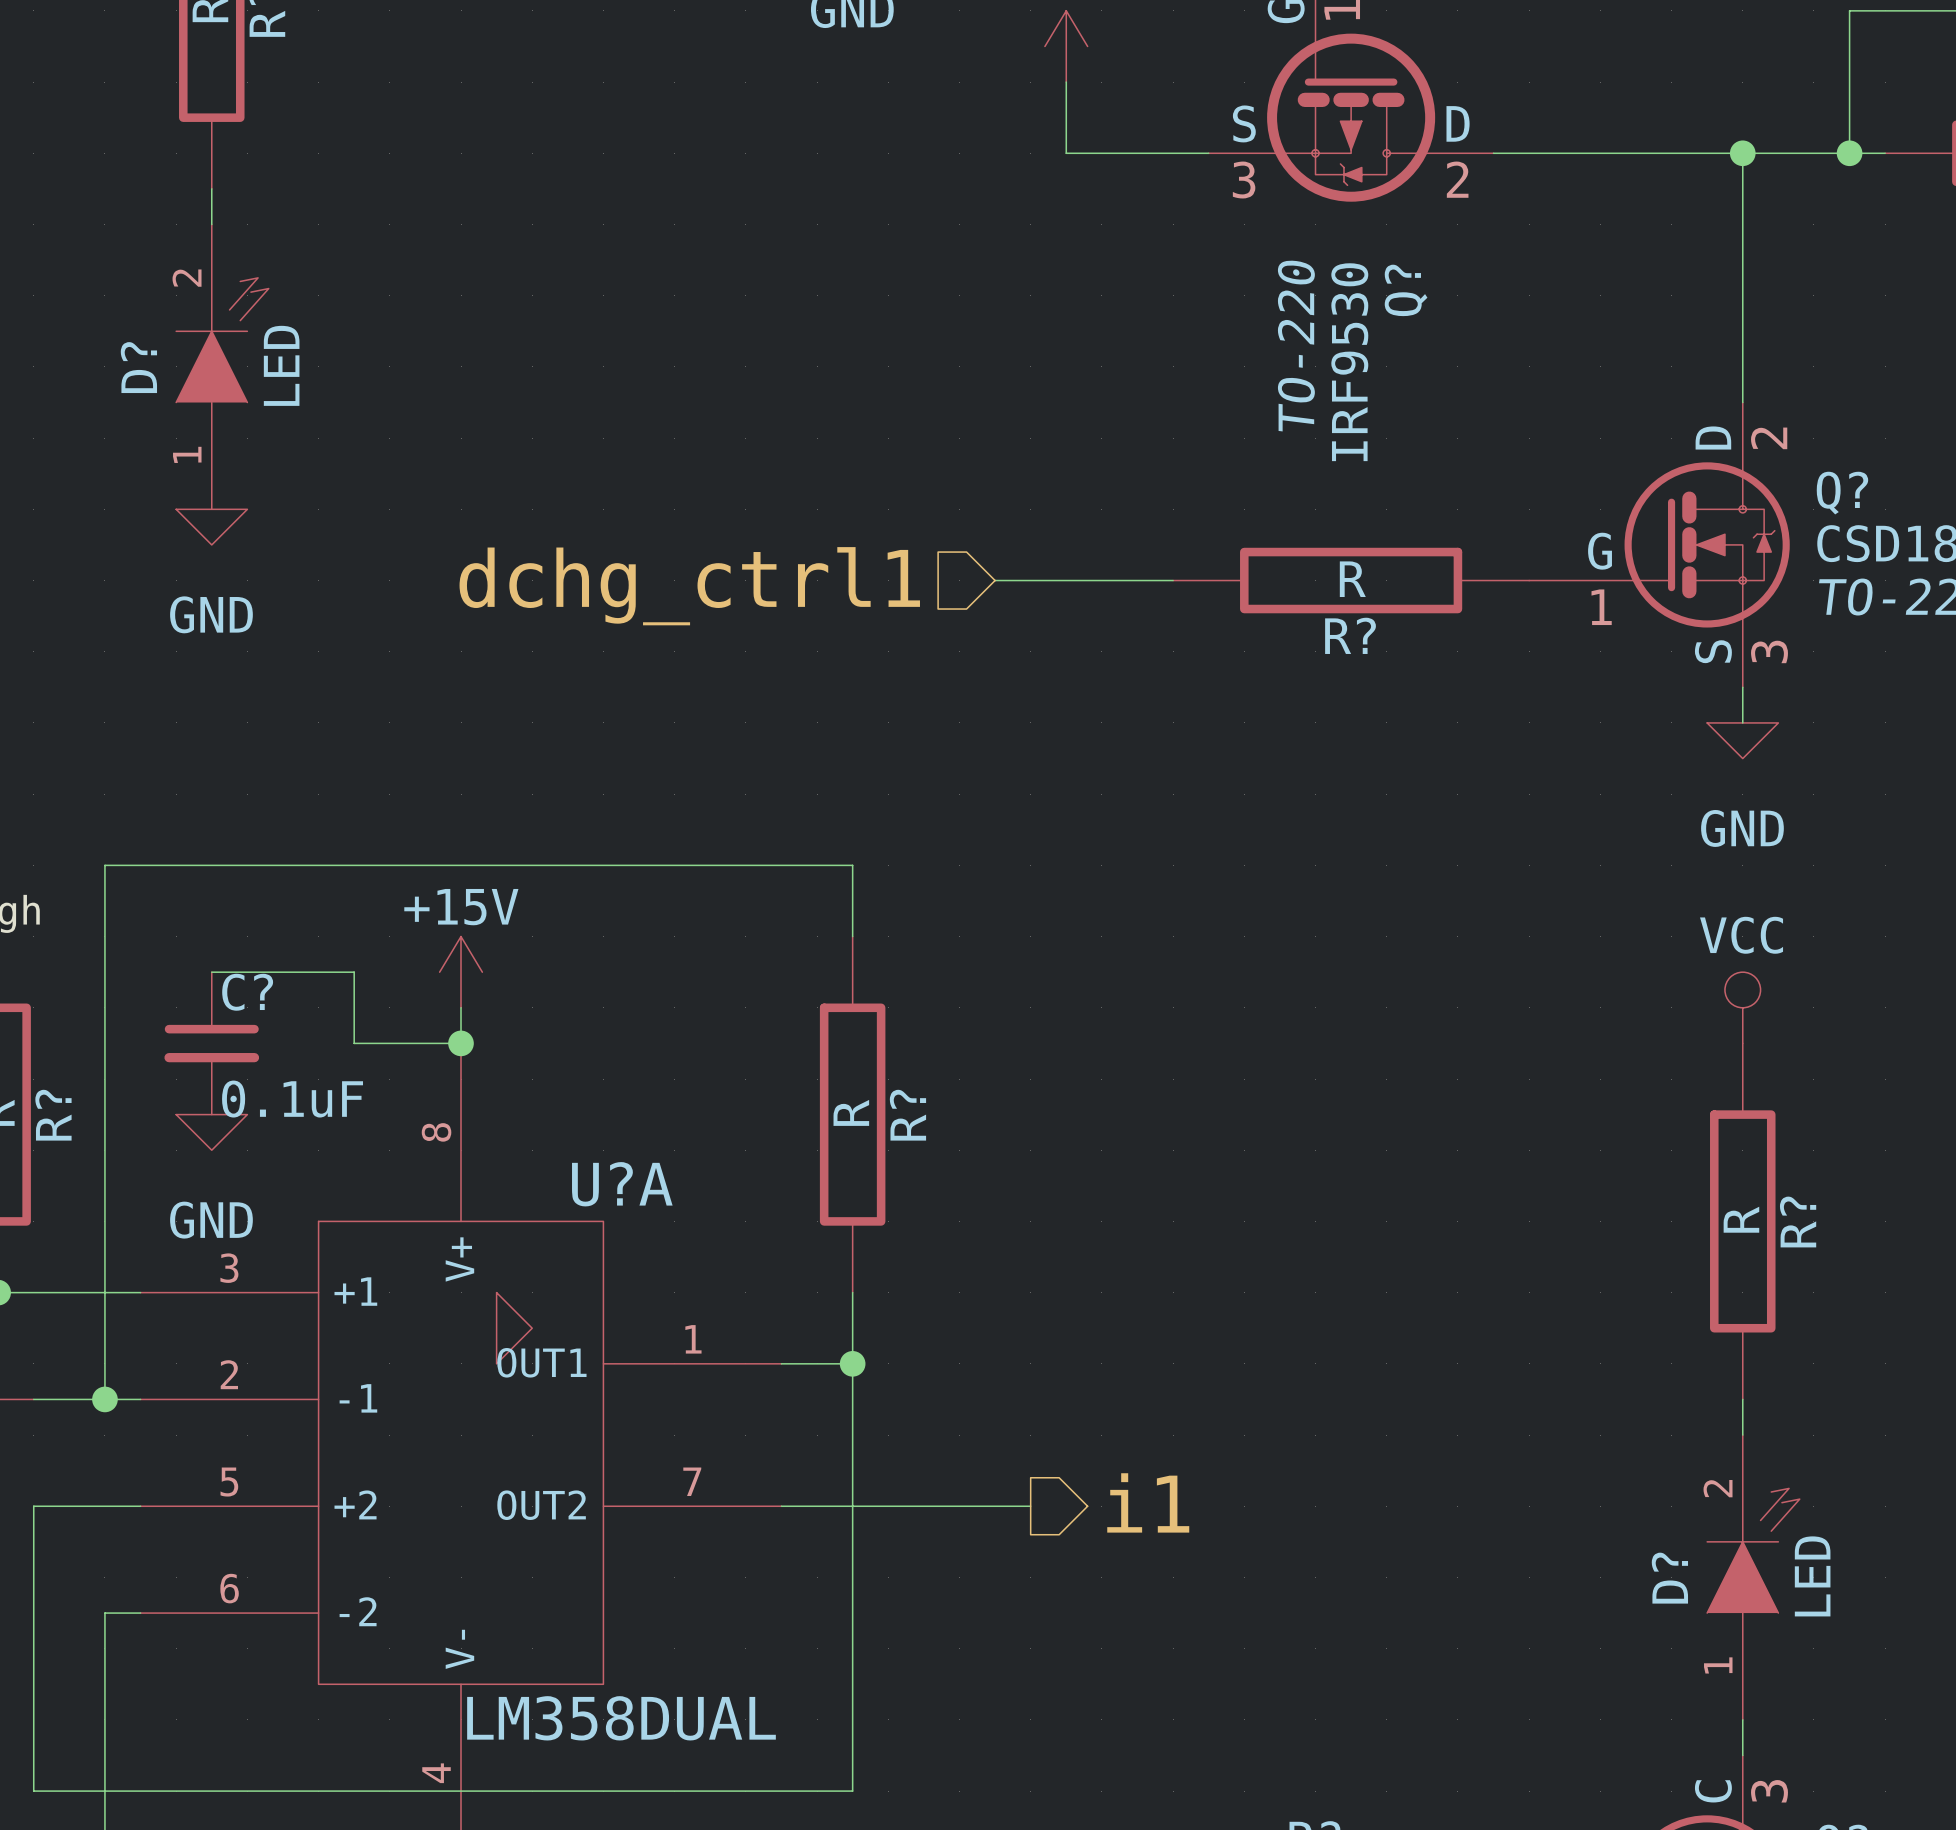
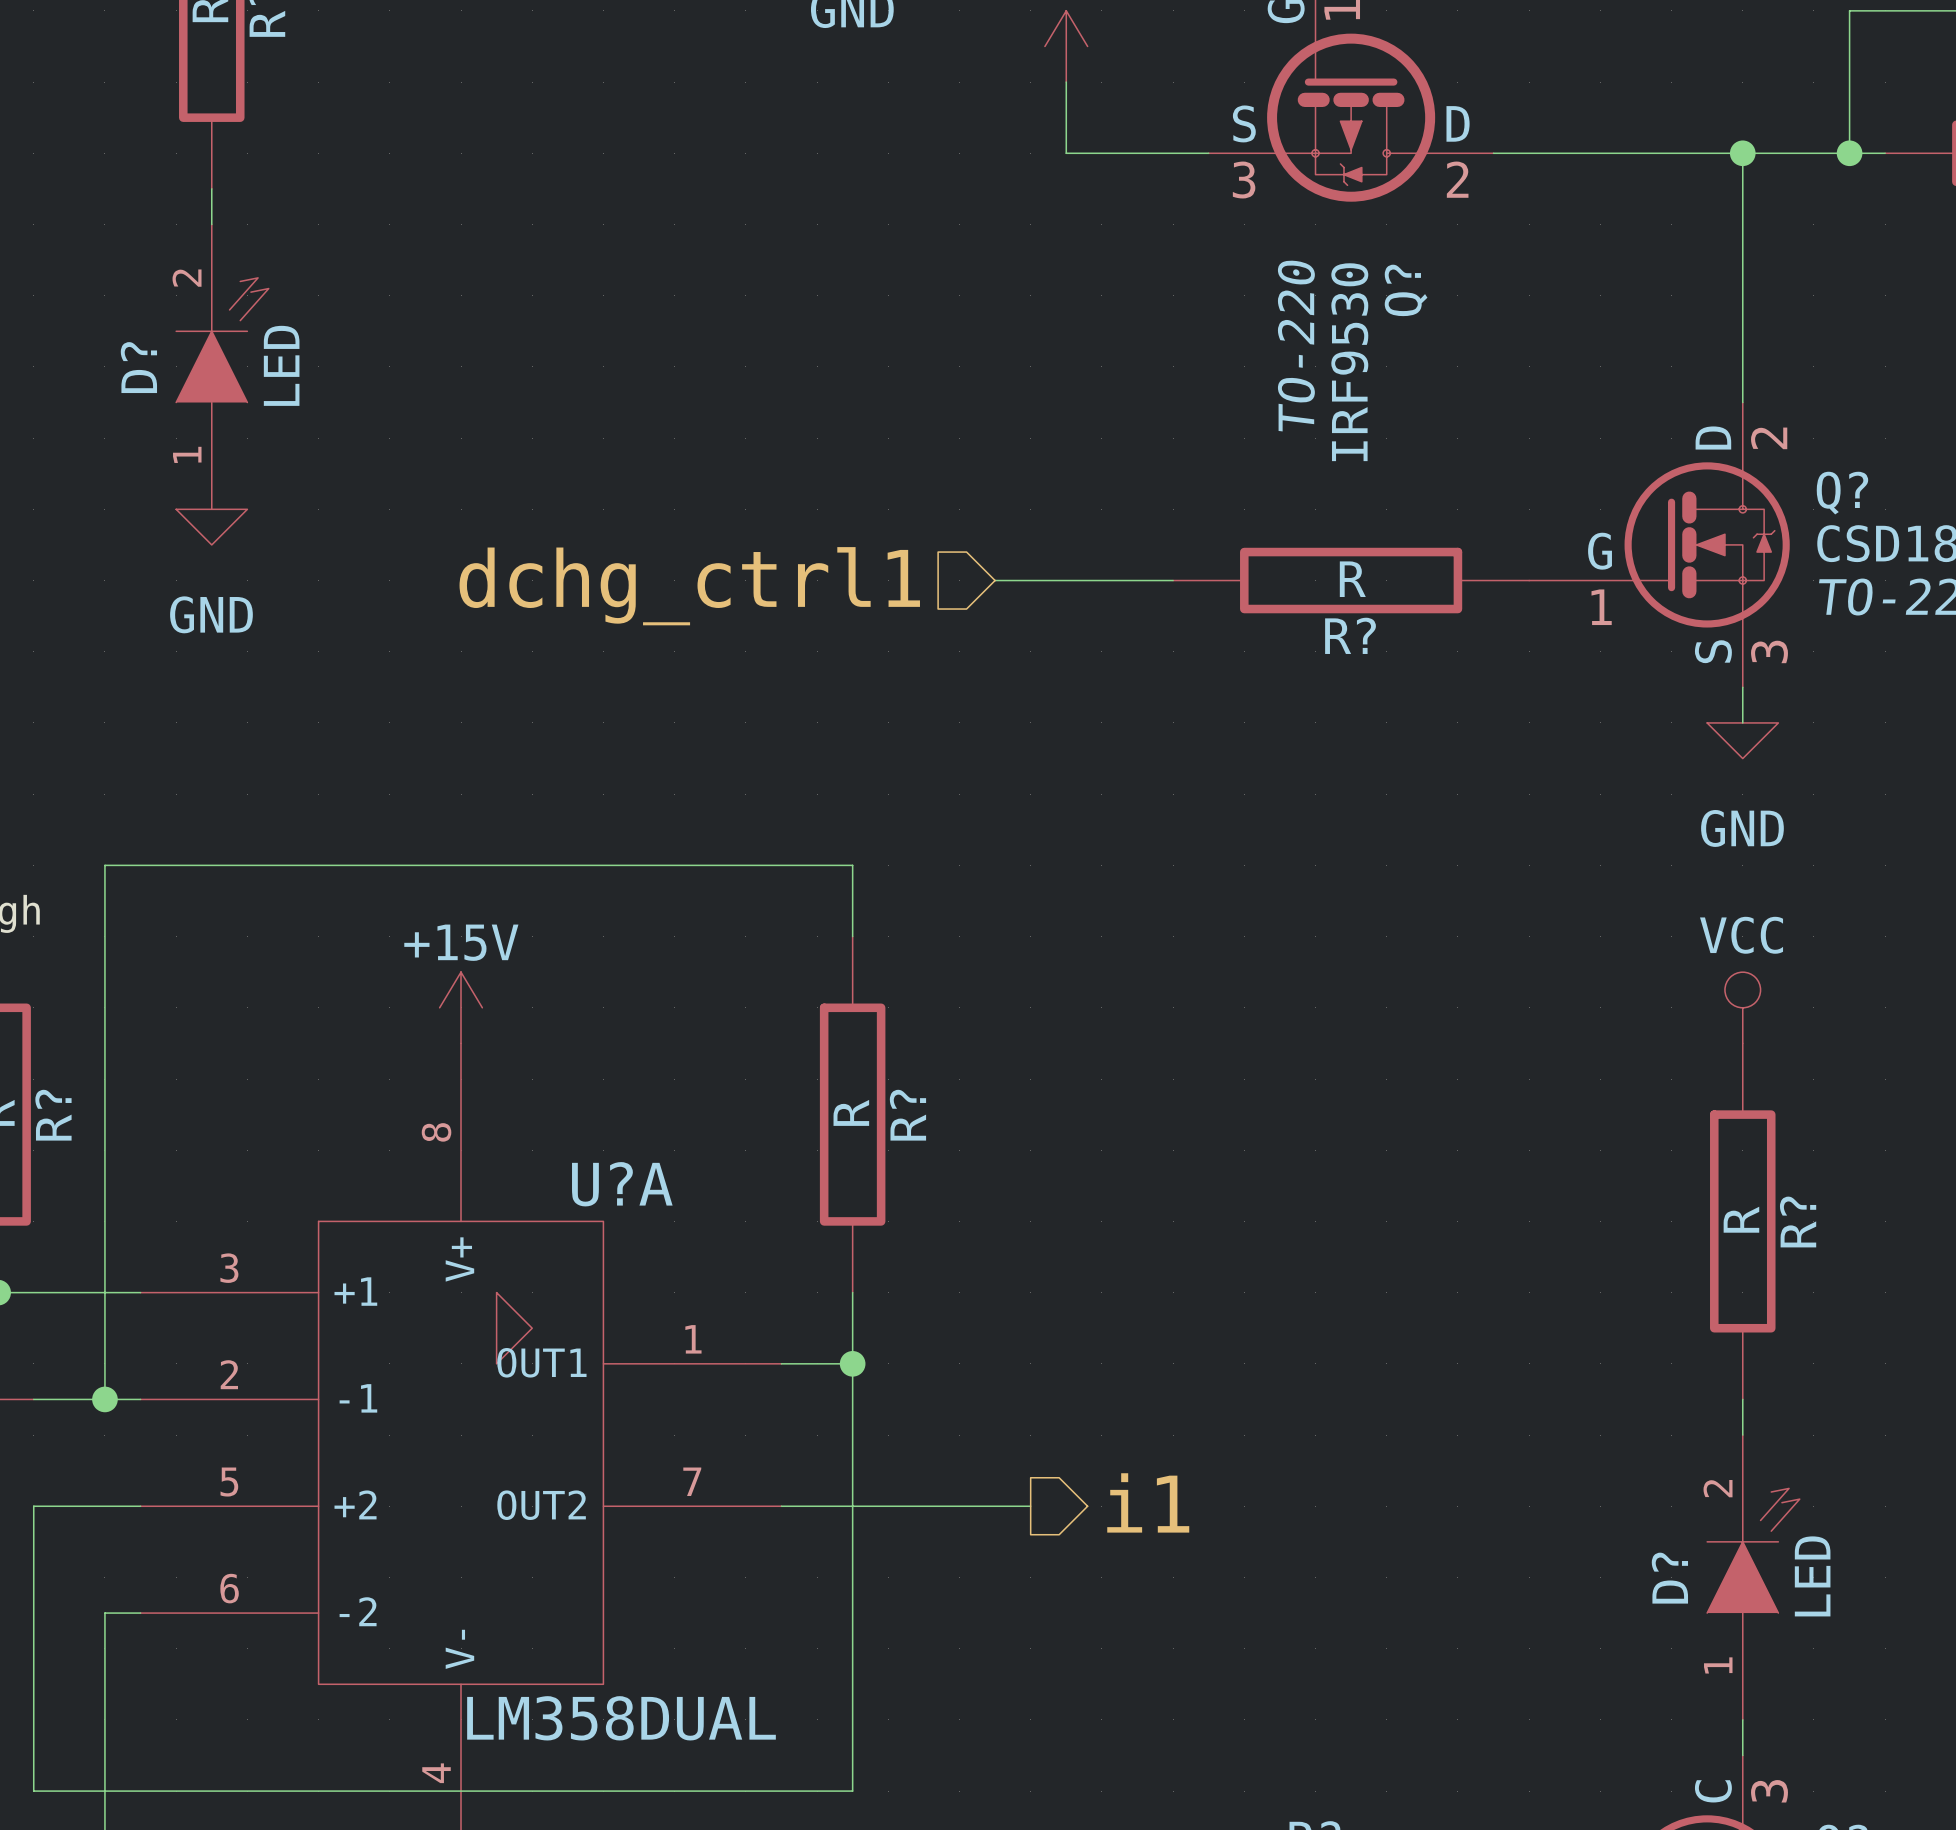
wire: (211, 972) (354, 972) (354, 1043) (461, 1043) (461, 1007) -> none
power symbol position: +15V (461, 972) -> +15V (461, 1007)
C?: 0.1uF (211, 1043) -> none
junction: (461, 1043) -> none
power symbol: GND (211, 1132) -> none

